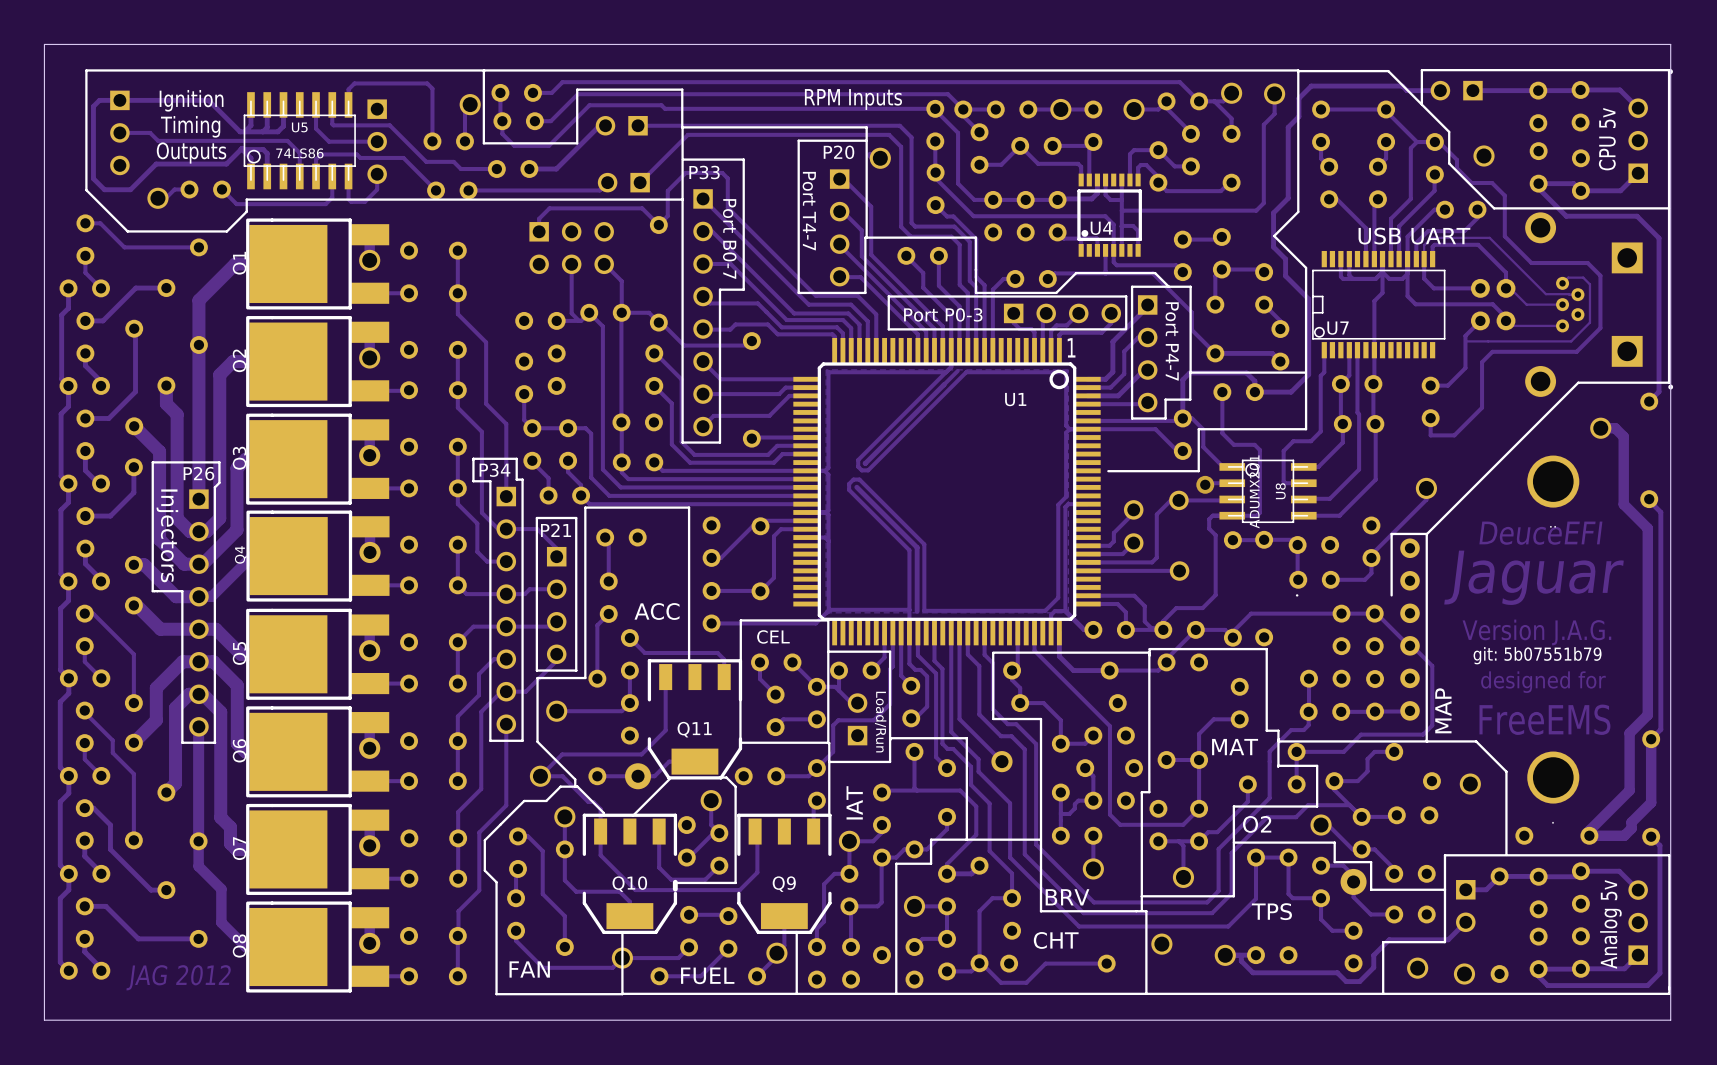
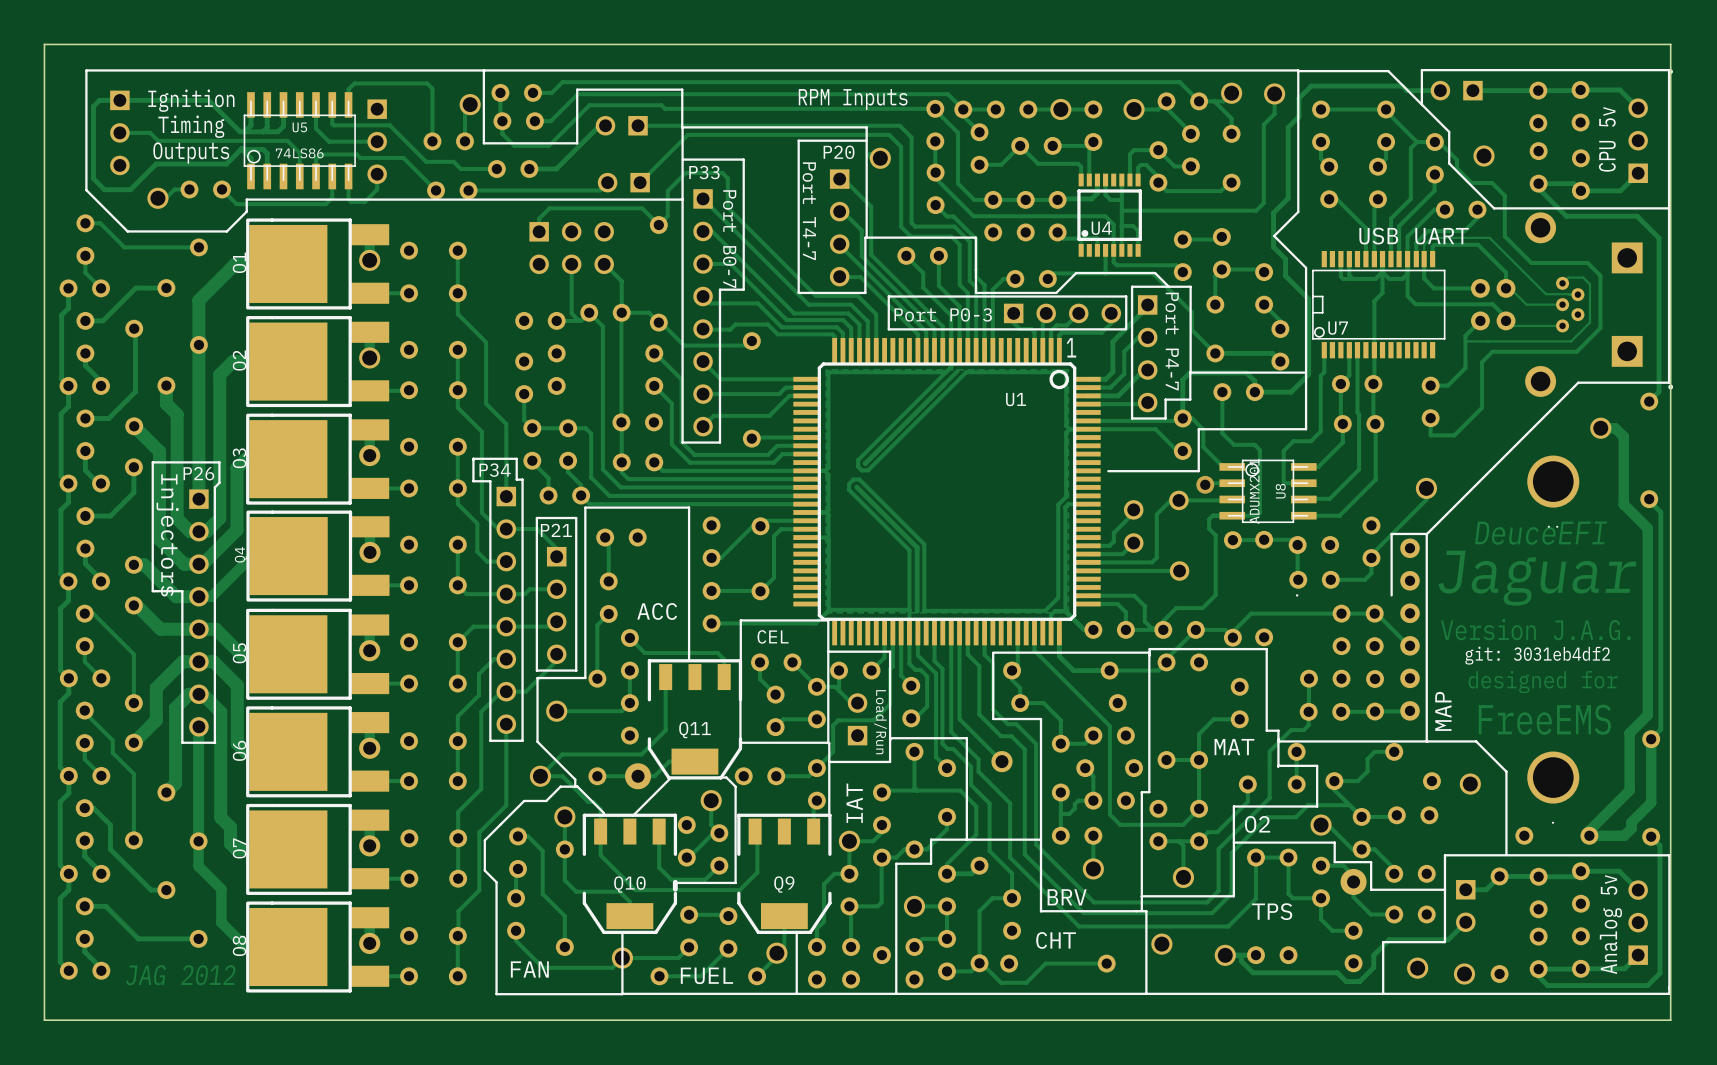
track: (1410, 645) (1432, 665) (1432, 725) (1423, 734) (1361, 734) (1343, 751) (1296, 751) -> none
text: git: 5b07551b79 (1537, 655) -> git: 3031eb4df2 (1537, 655)

